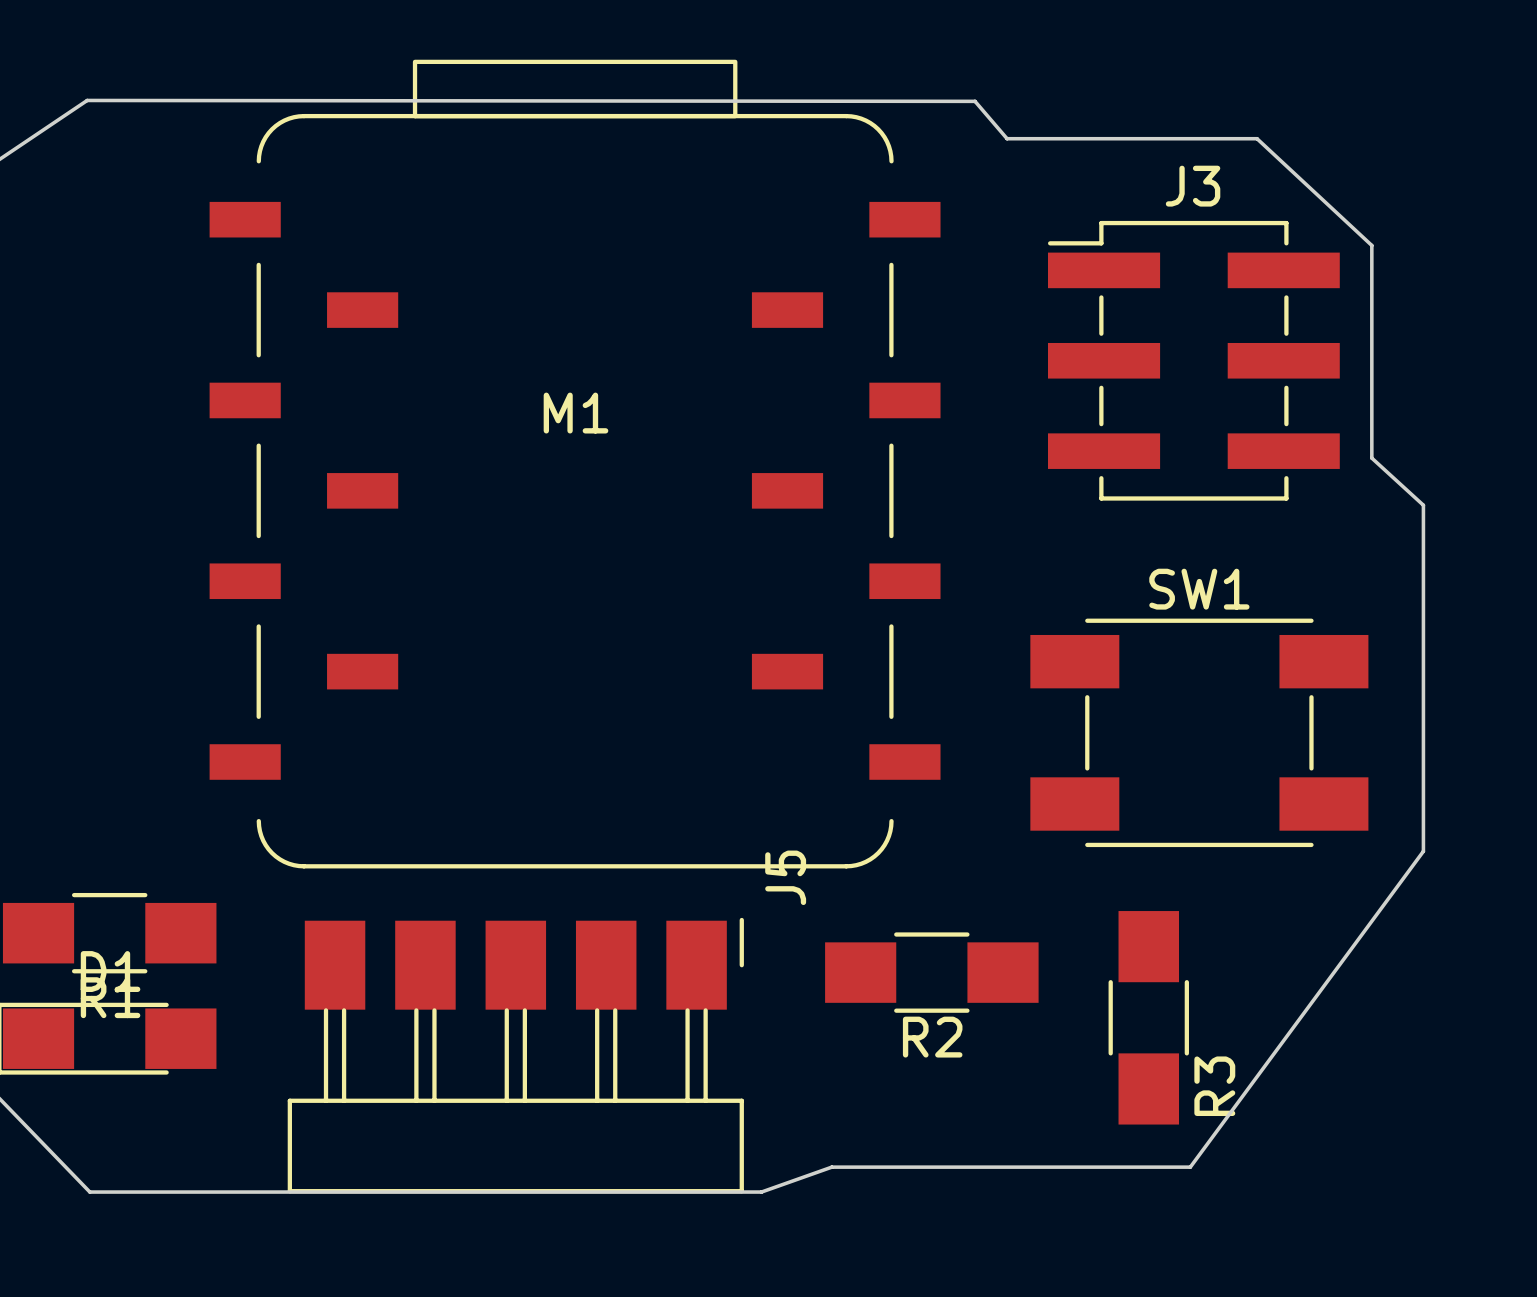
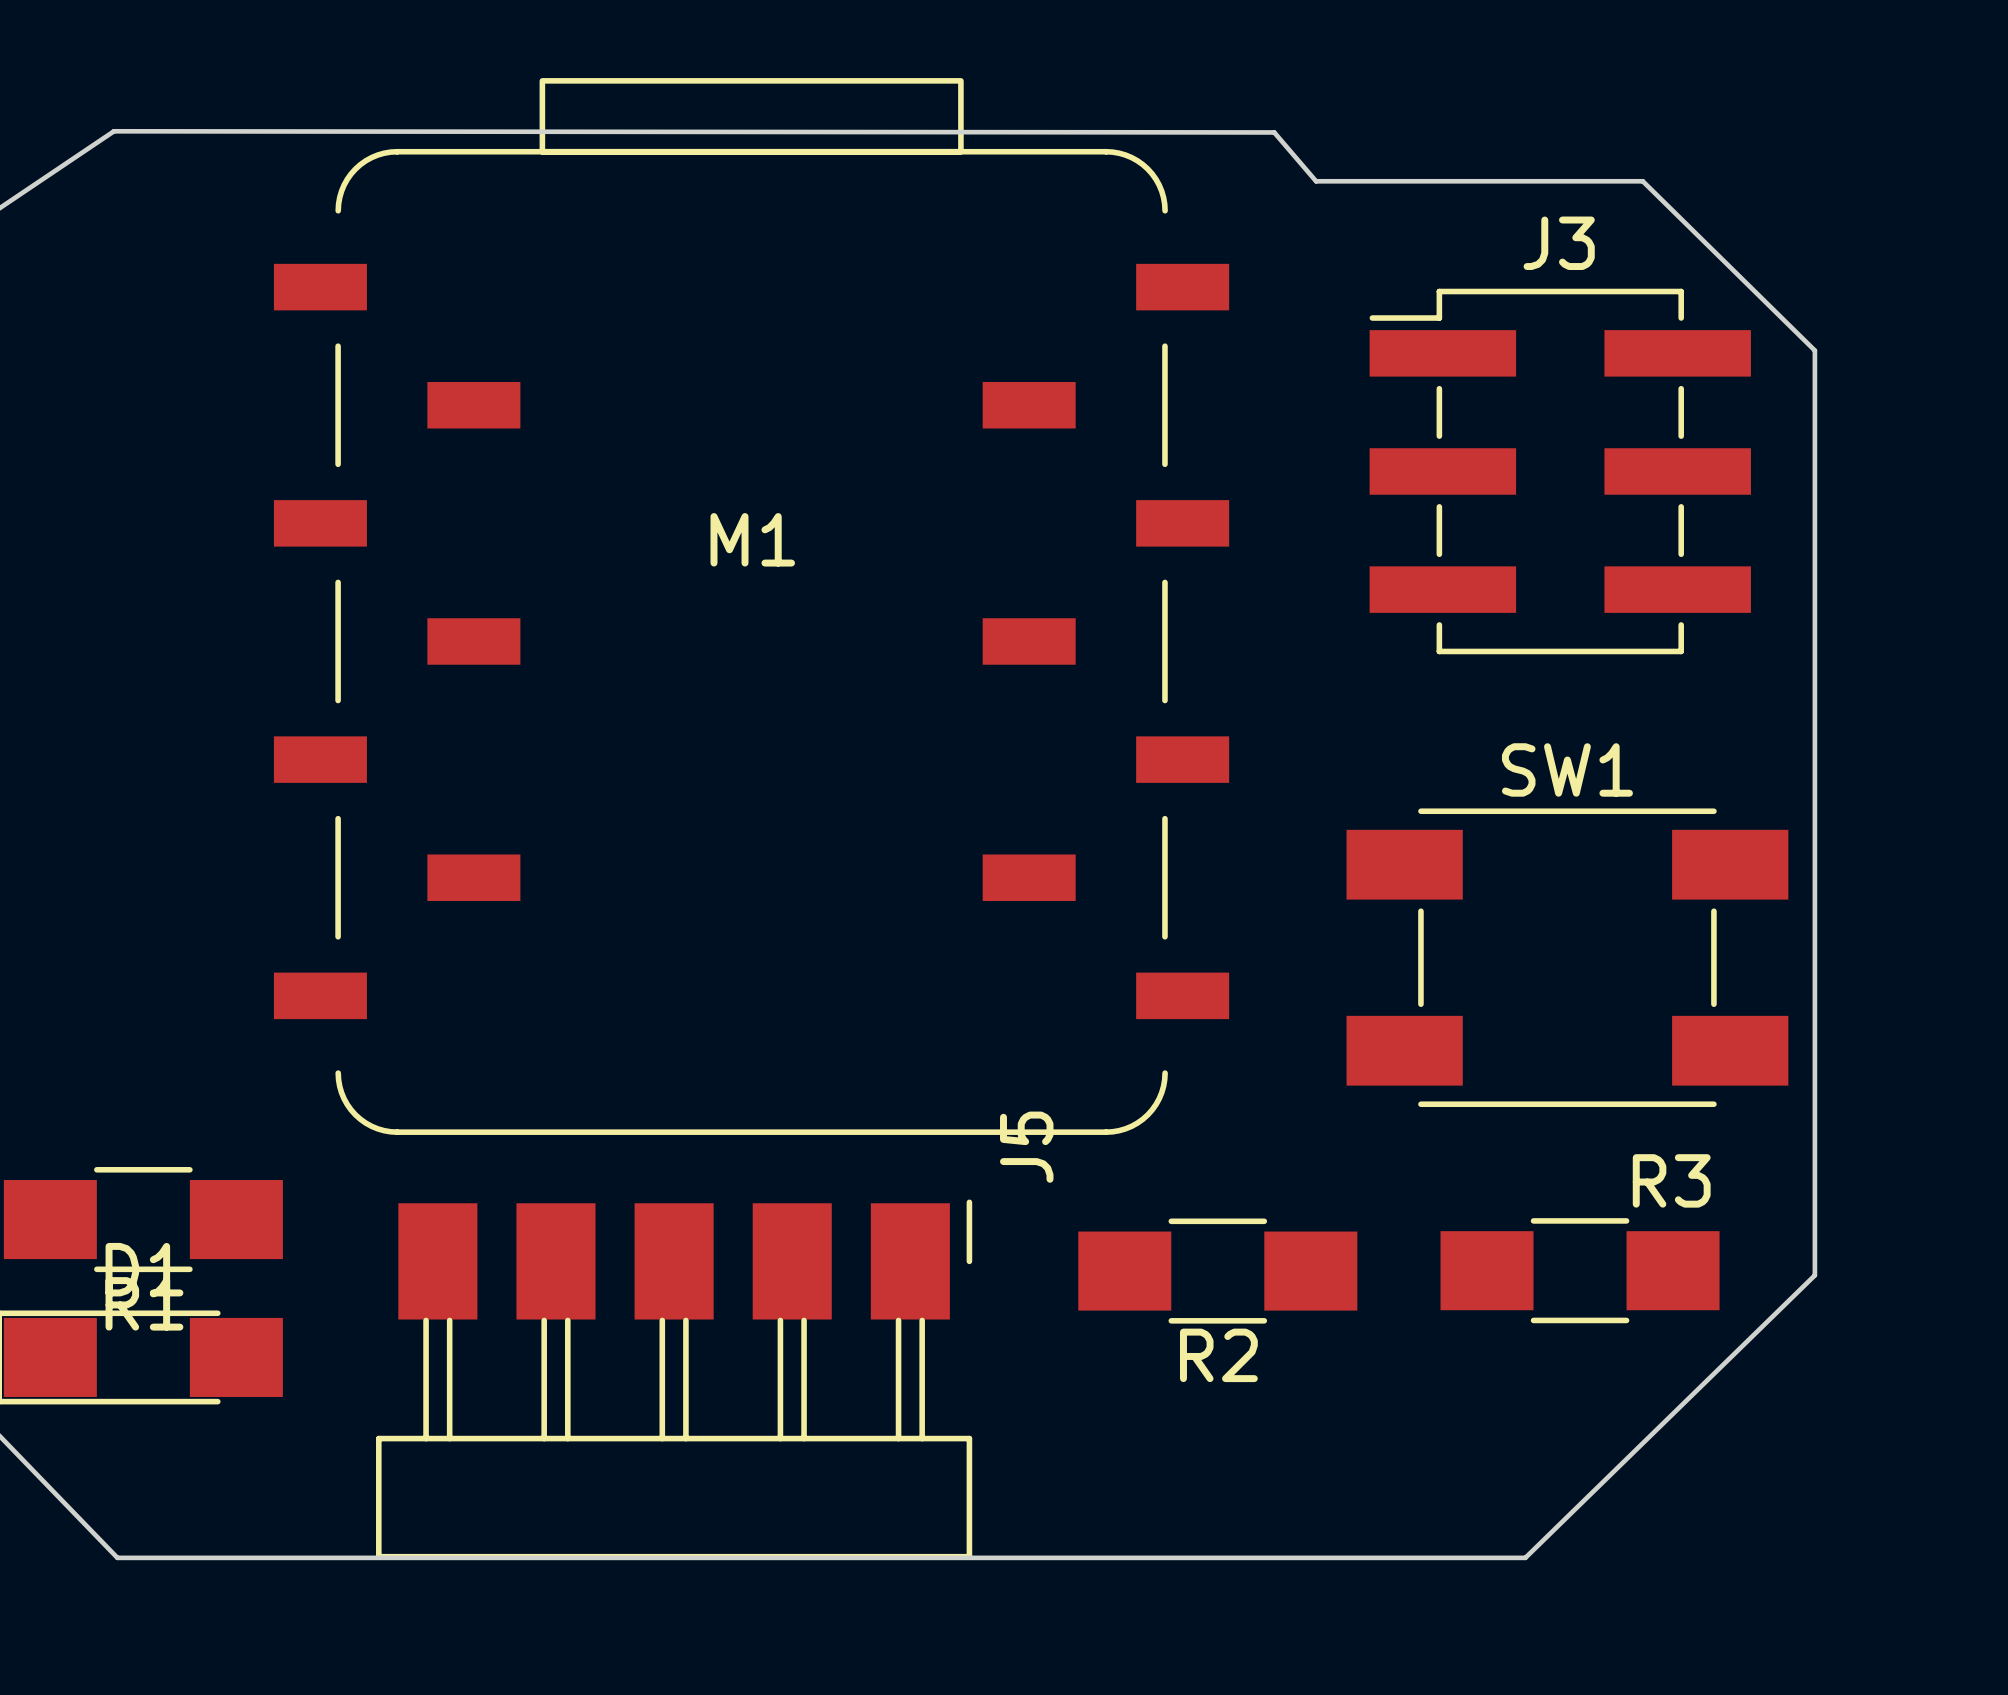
board edge: (1257, 138) (1371, 245) (1371, 458) (1423, 505) (1423, 851) (1190, 1167) (831, 1167) (761, 1192) -> (1642, 181) (1814, 350) (1814, 1275) (1525, 1557) (995, 1557)
R3 rotation: 0° (1148, 1017) -> 90° clockwise (1580, 1270)
R3 name position: R3 (1214, 1086) -> R3 (1671, 1180)

